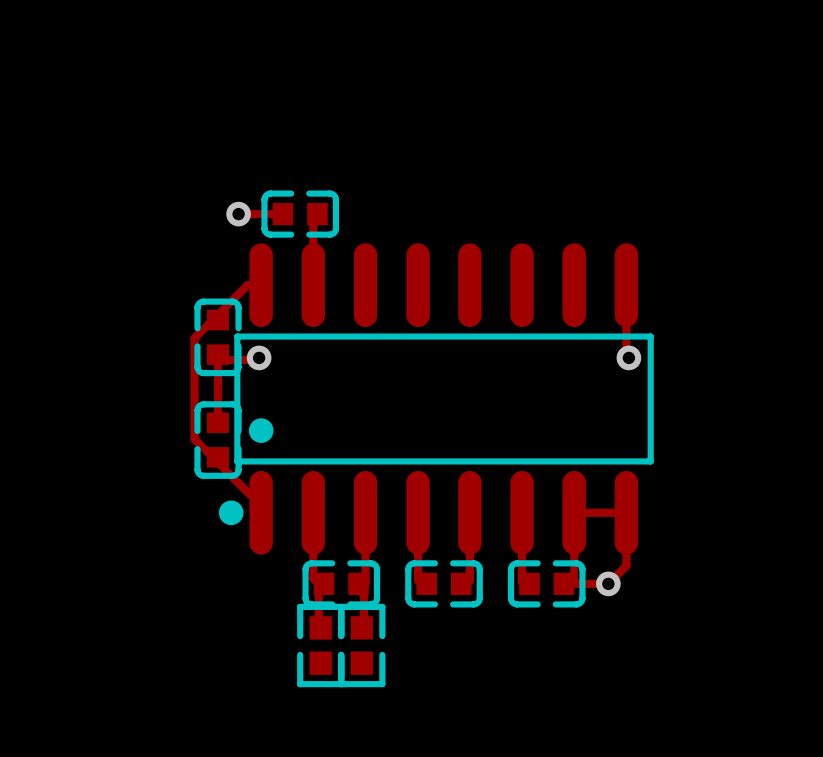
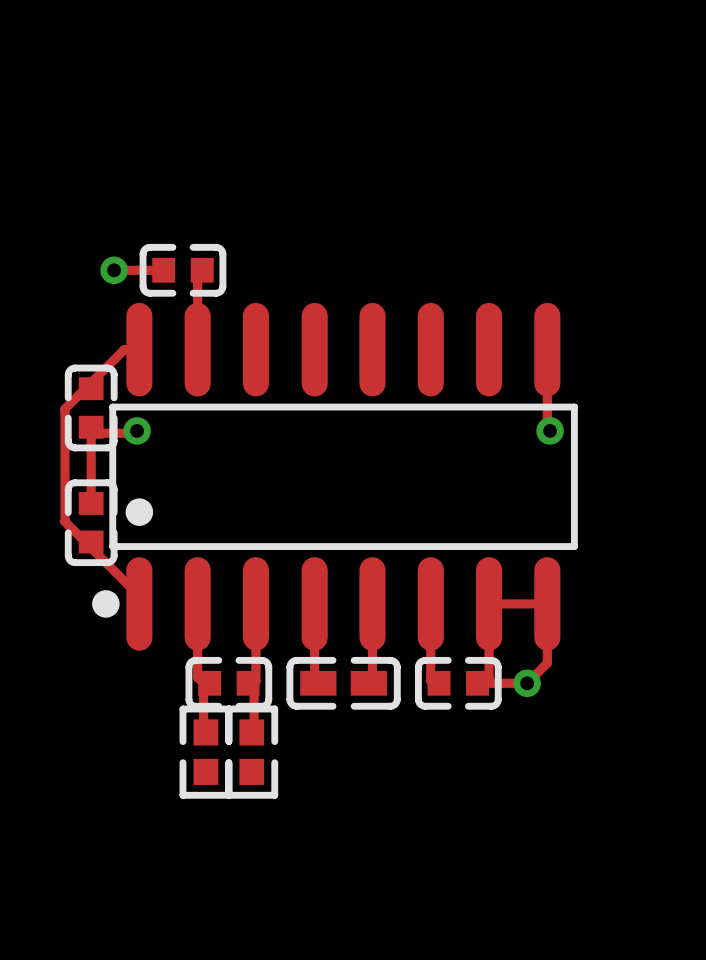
part footprint: [405, 560, 483, 608] -> [286, 656, 401, 710]

